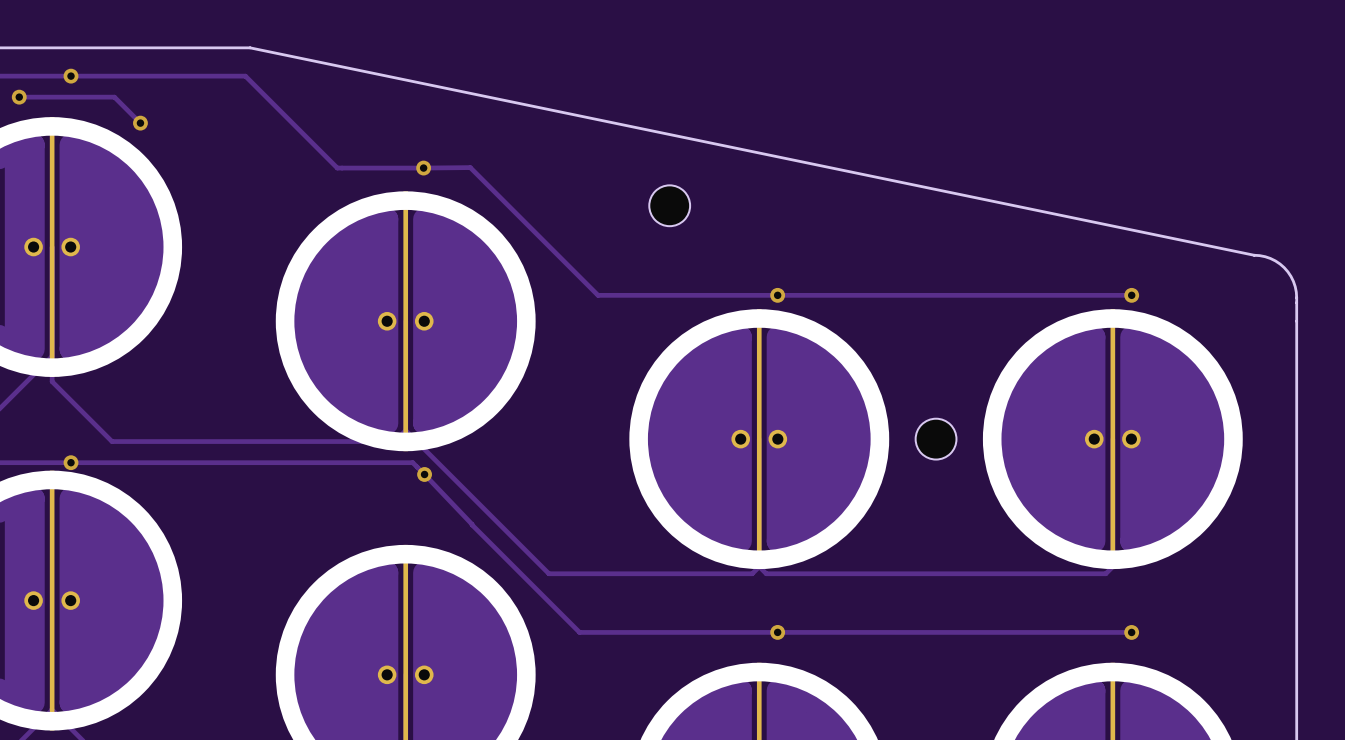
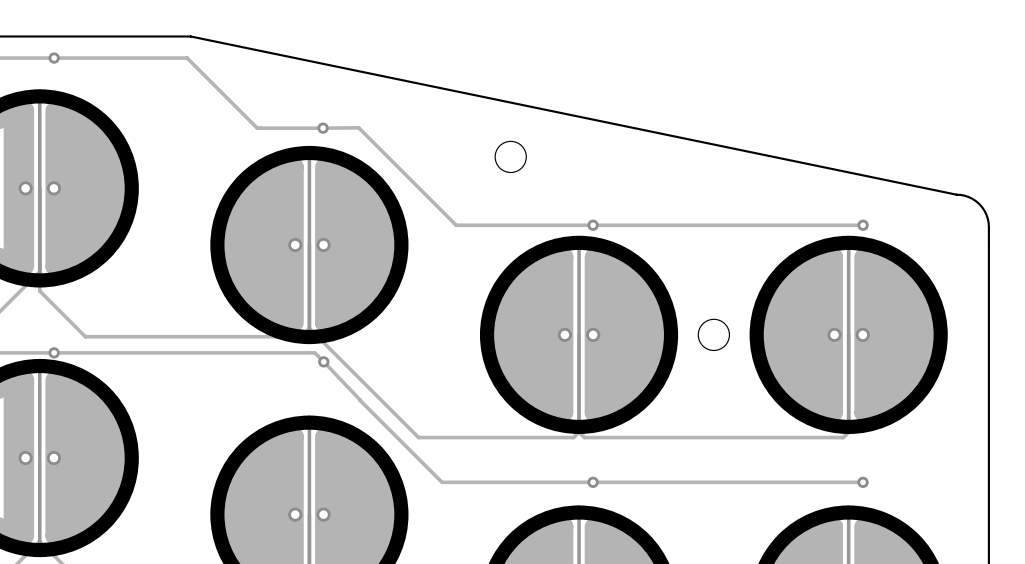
track: (19, 97) (114, 97) (140, 123) -> none
via: (19, 97) -> none
via: (140, 123) -> none

